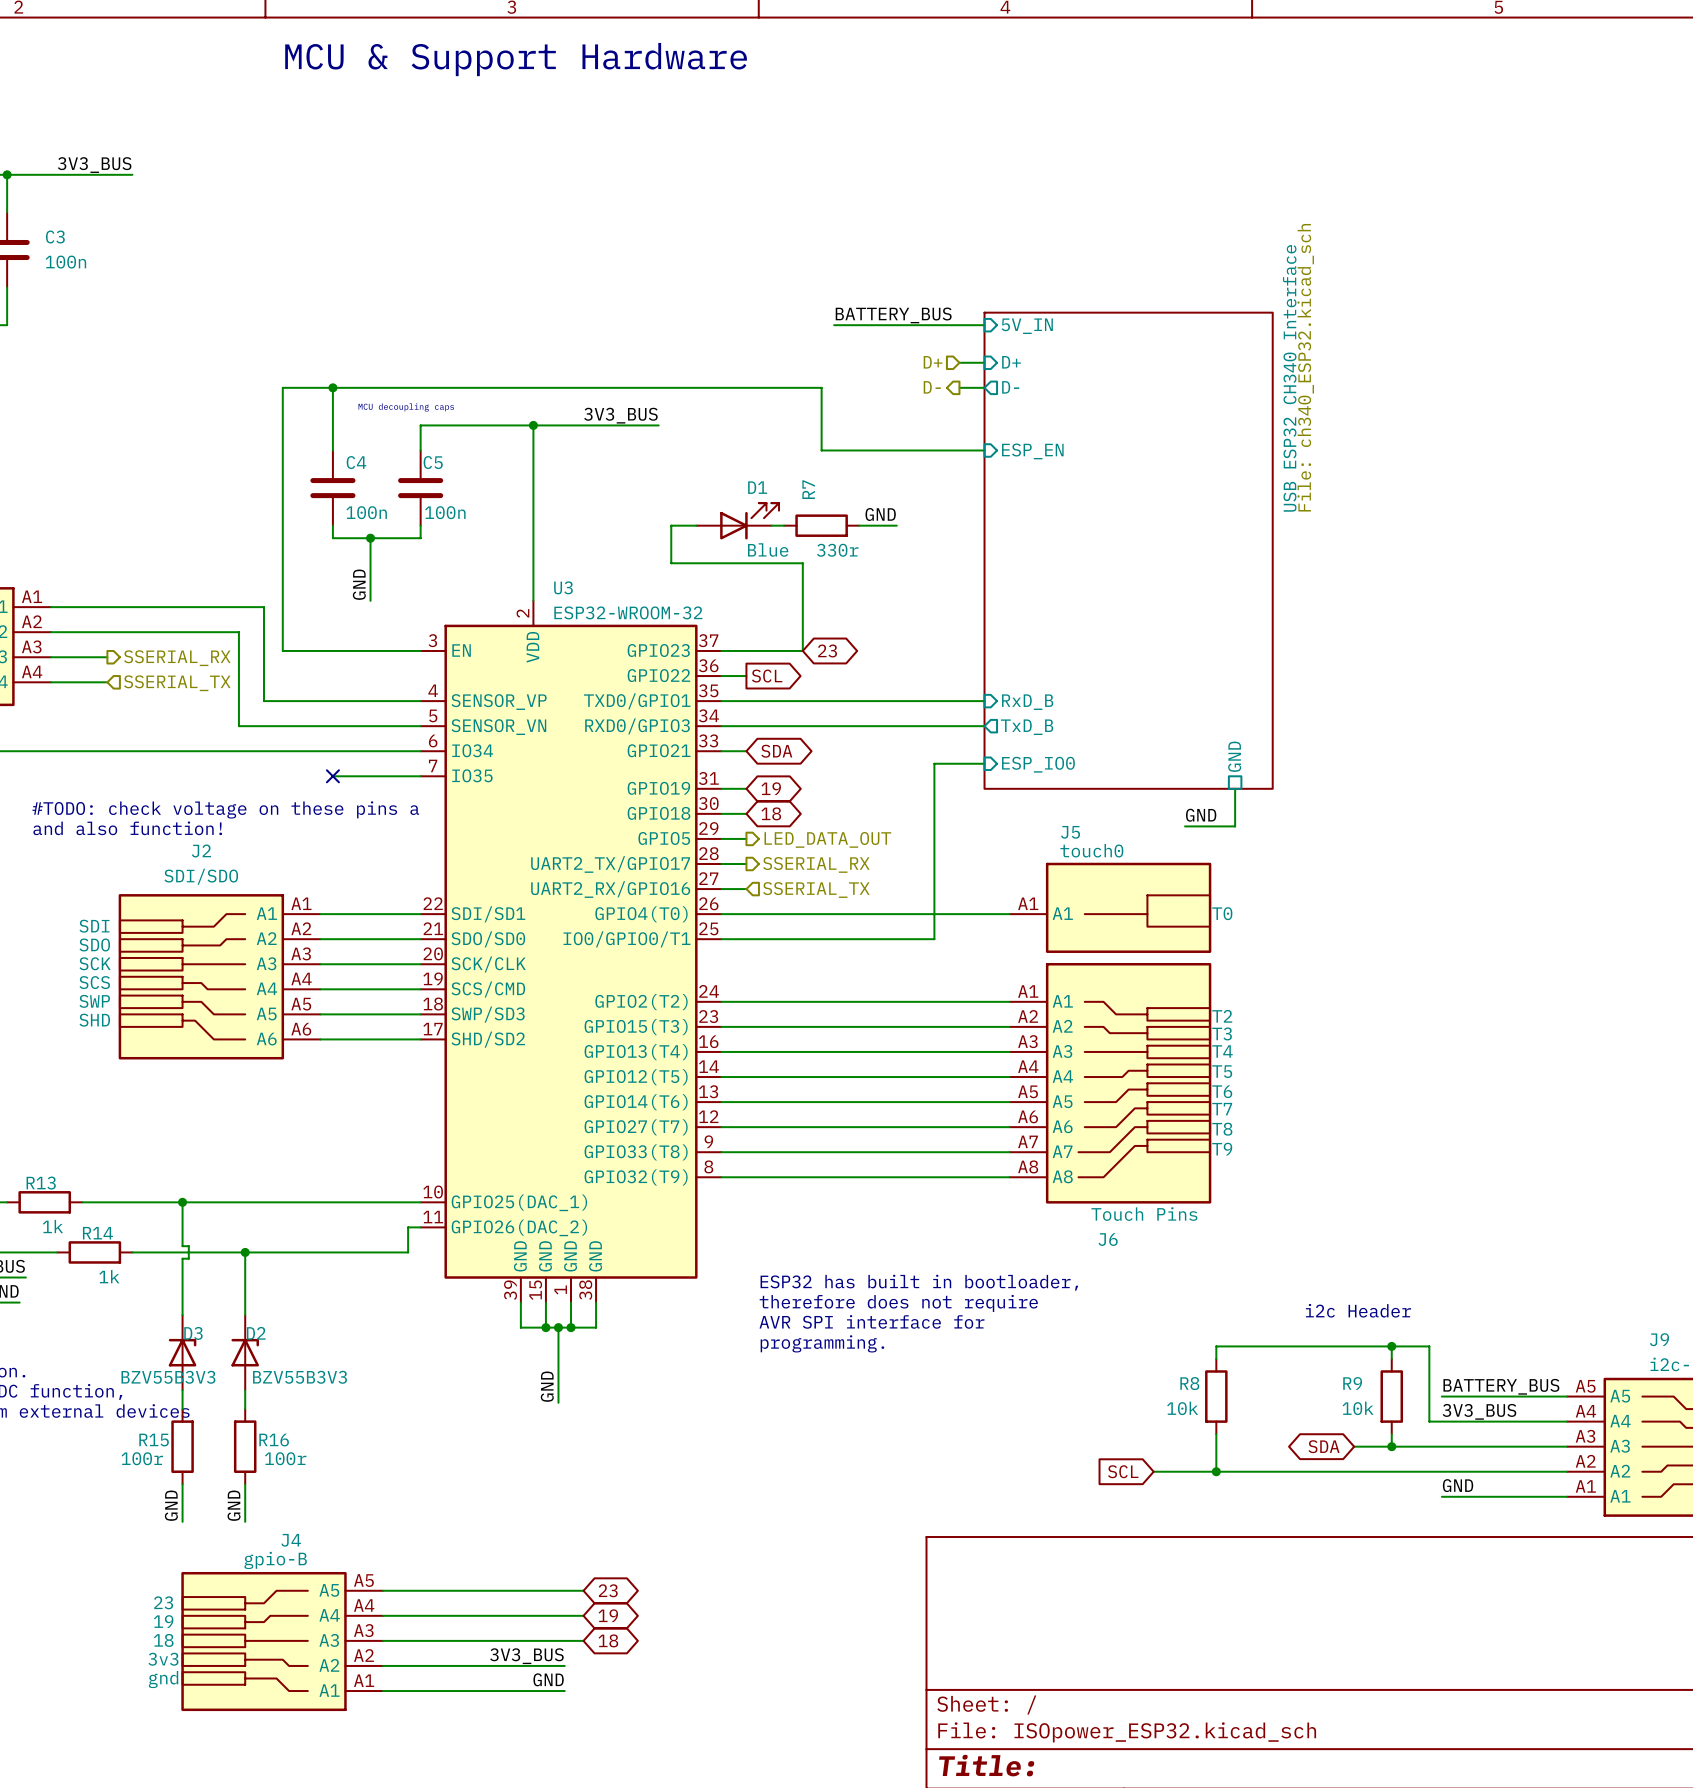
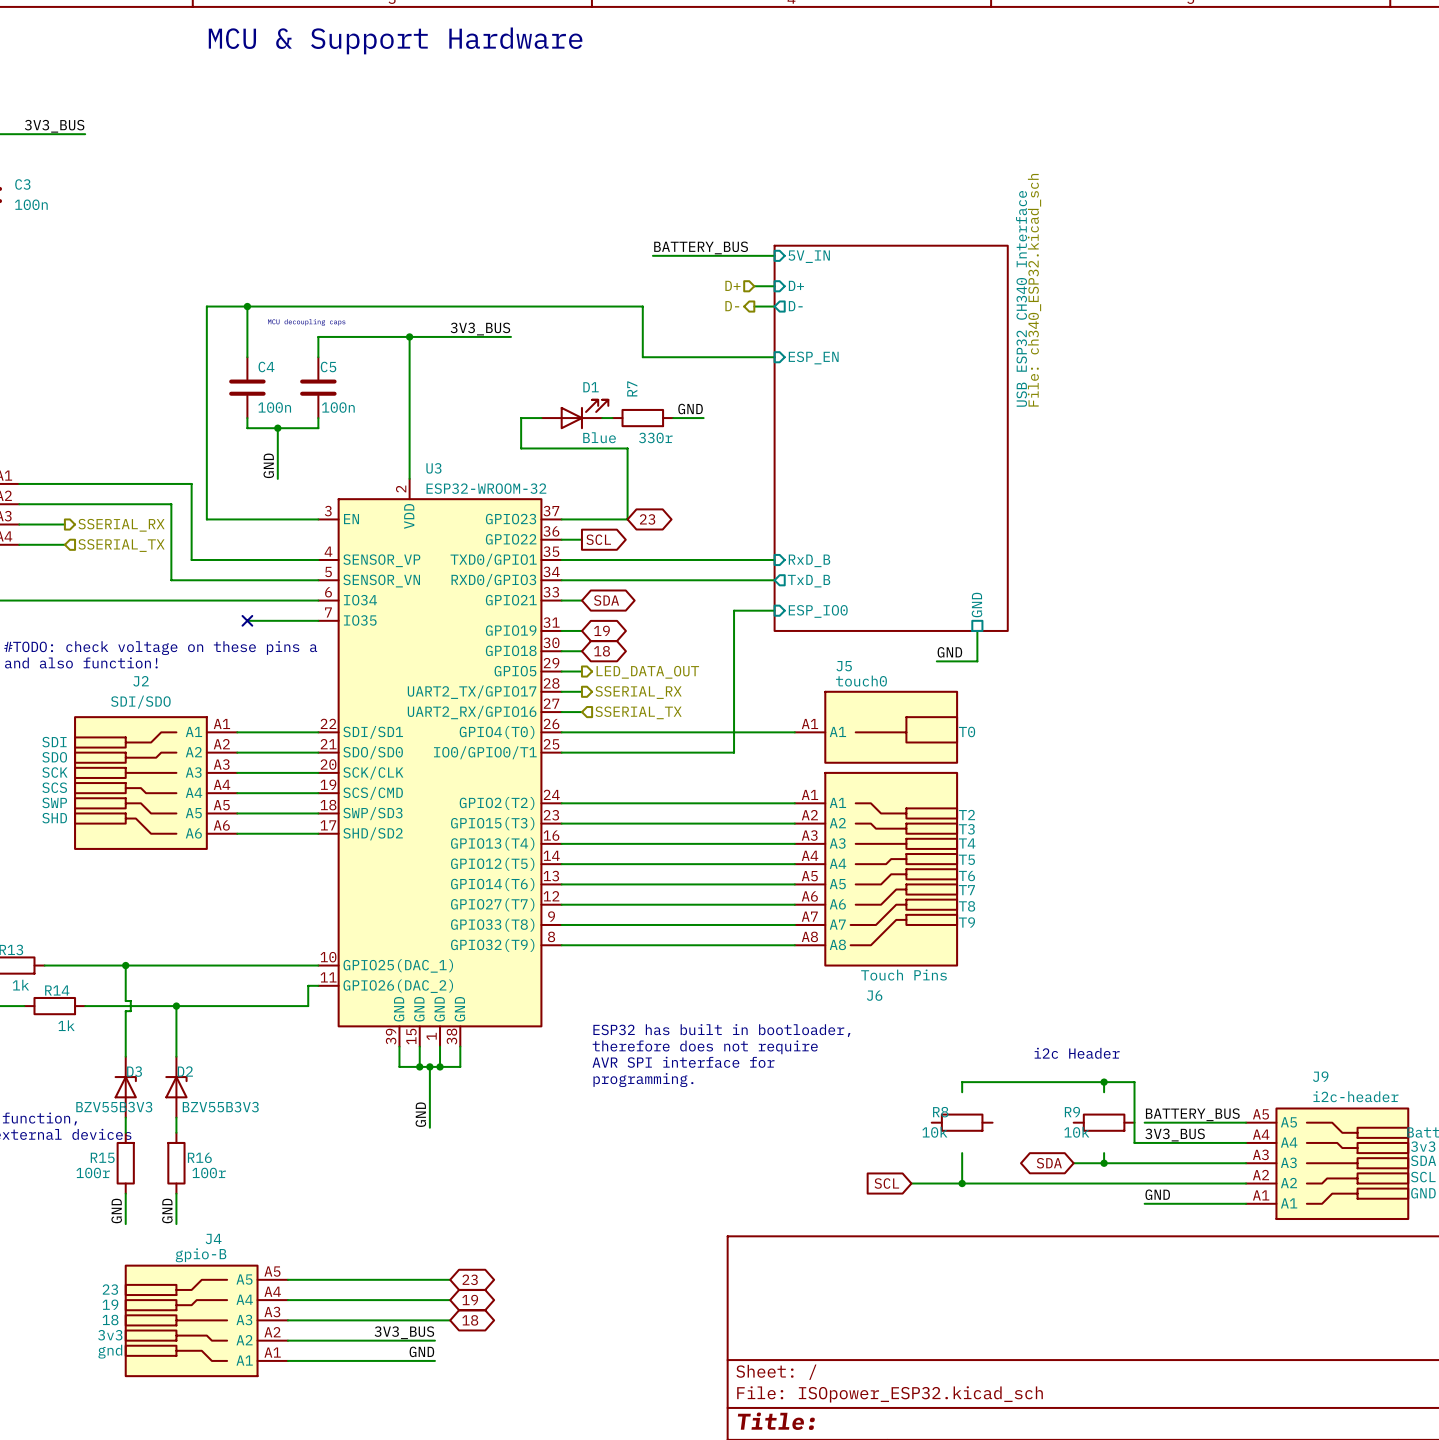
R8 rotation: 0° (1216, 1396) -> 90° clockwise (962, 1122)
R9 rotation: 0° (1391, 1396) -> 90° clockwise (1104, 1122)

